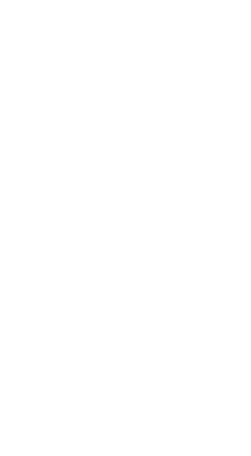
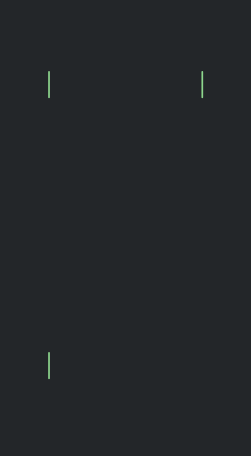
wire: none -> (49, 71) (49, 97)
wire: none -> (202, 71) (202, 97)
wire: none -> (49, 352) (49, 378)

